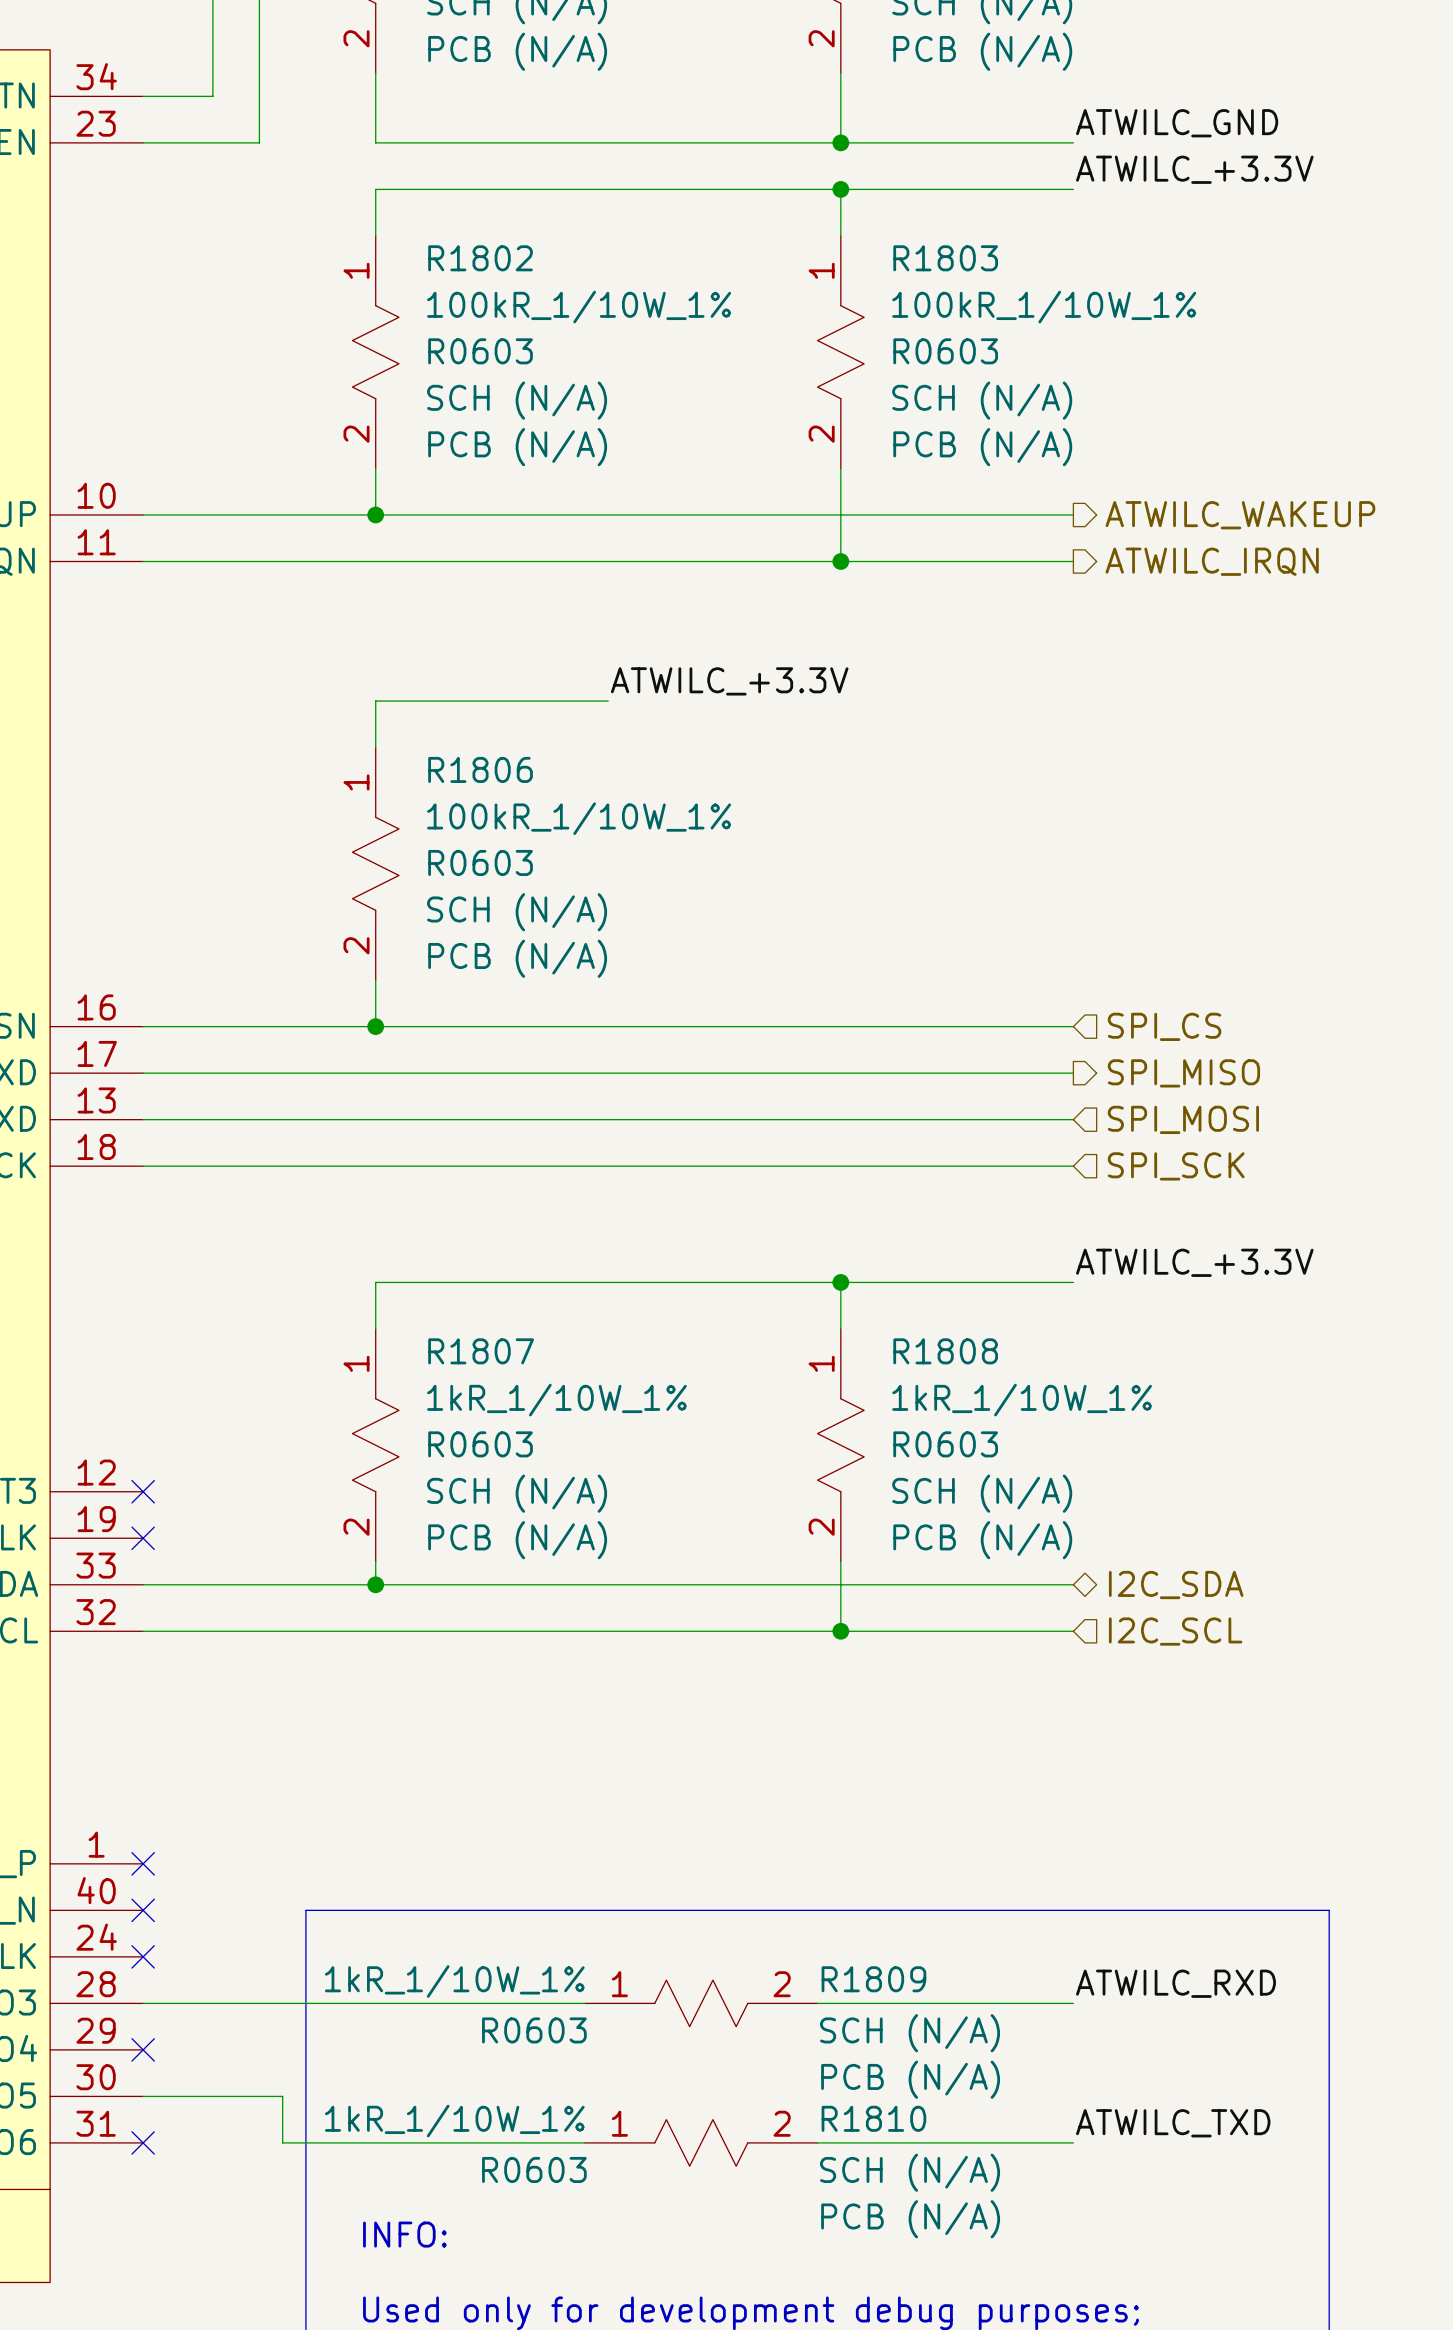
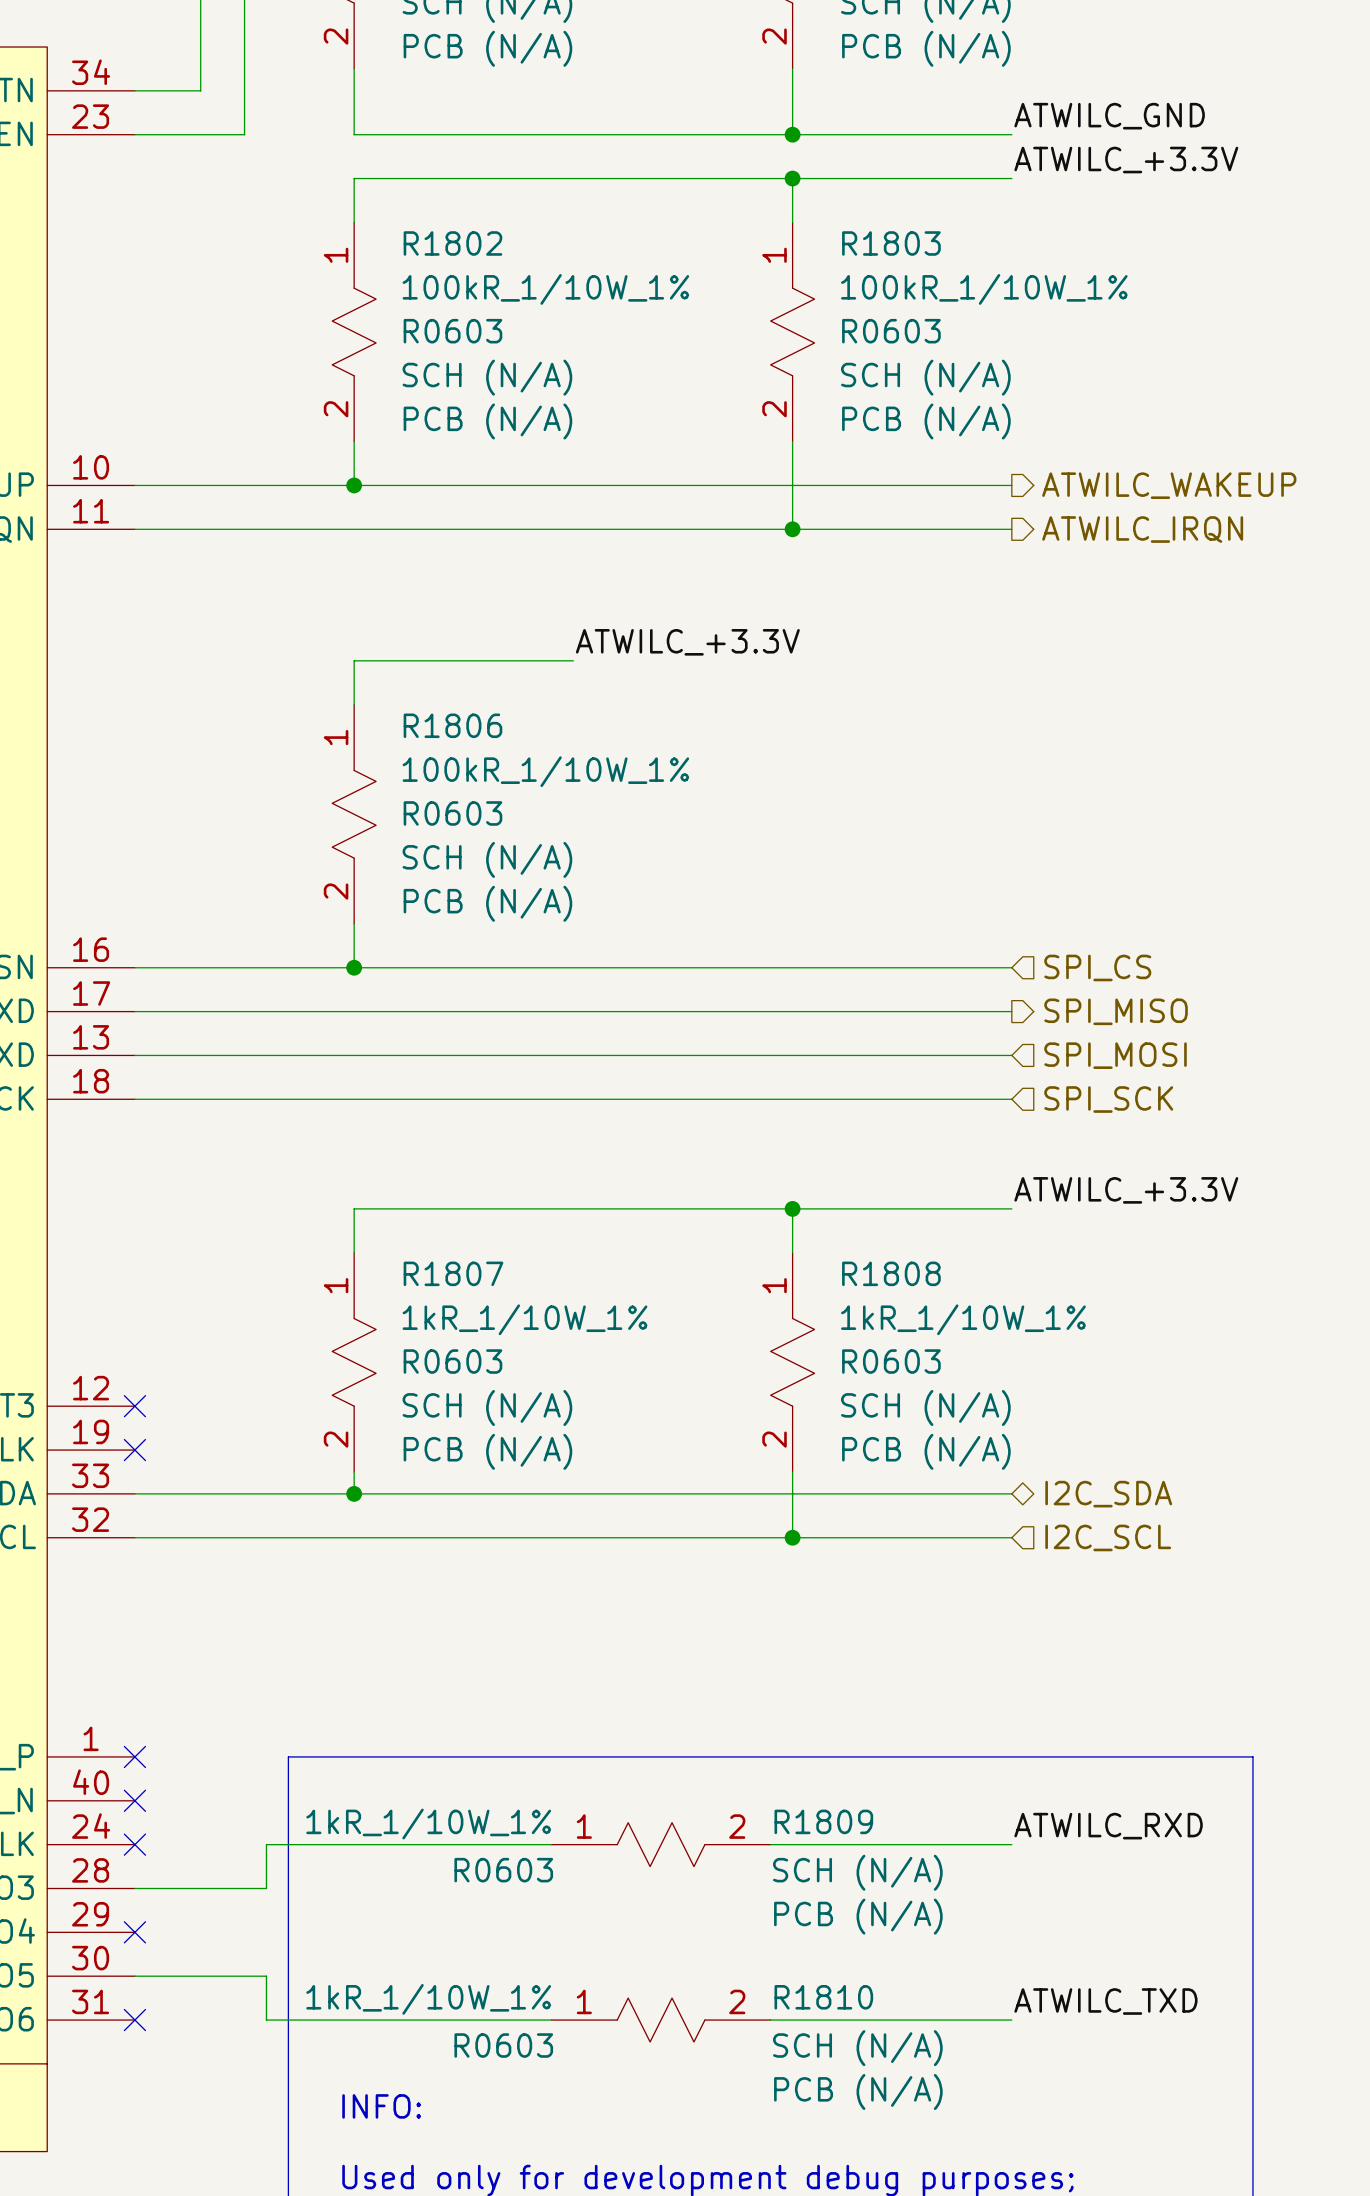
line: (305, 1910) (1329, 1910) -> (288, 1800) (288, 1756) (1252, 1756) (1252, 1800)
label position: ATWILC_RXD (1176, 1983) -> ATWILC_RXD (1108, 1826)
wire: (282, 2003) (585, 2003) -> (266, 1888) (266, 1844) (551, 1844)
R1809 position: (701, 2003) -> (661, 1844)
wire: (817, 2003) (1073, 2003) -> (770, 1844) (1011, 1844)

